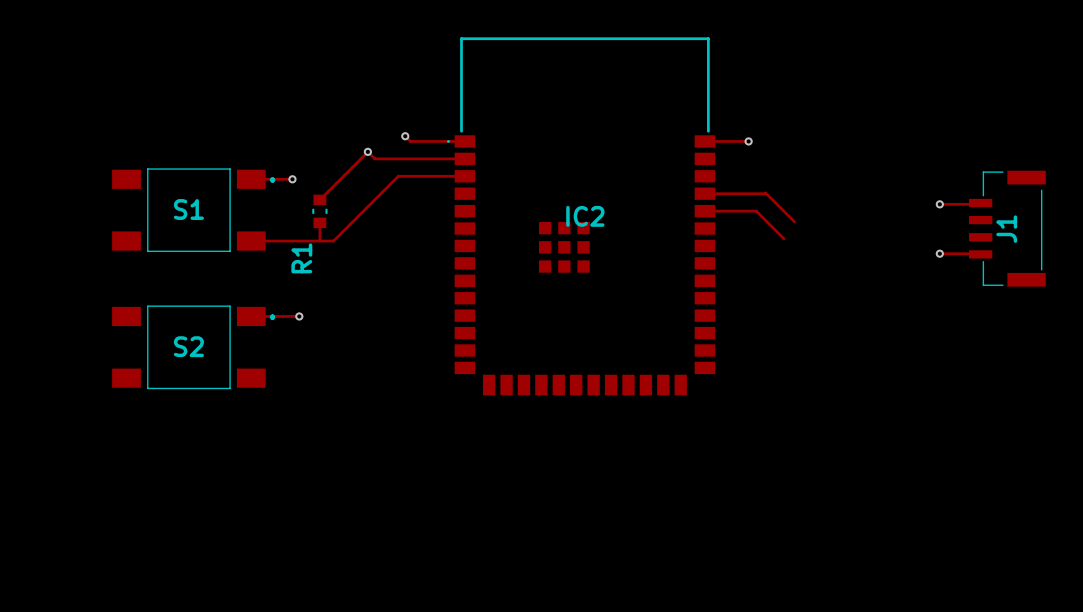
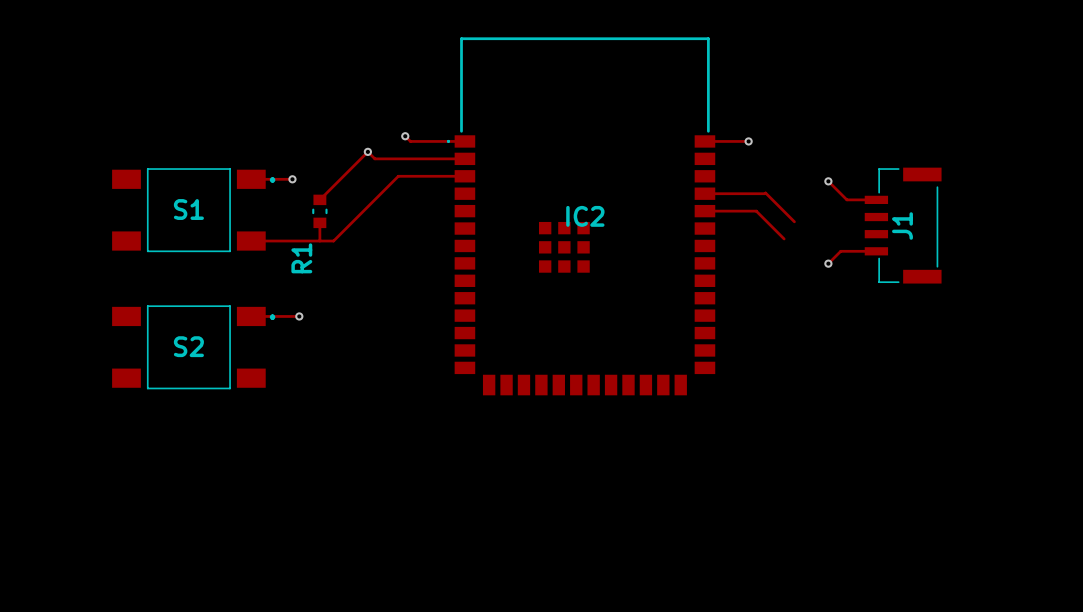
top track: none -> (828, 181) (846, 199) (876, 199)
via: none -> (828, 181)
top track: (939, 204) (980, 204) -> none
via: (939, 204) -> none
J1 position: (1007, 228) -> (903, 225)
top track: none -> (876, 251) (840, 251) (828, 263)
top track: (939, 253) (980, 253) -> none
via: (939, 253) -> none
via: none -> (828, 263)

